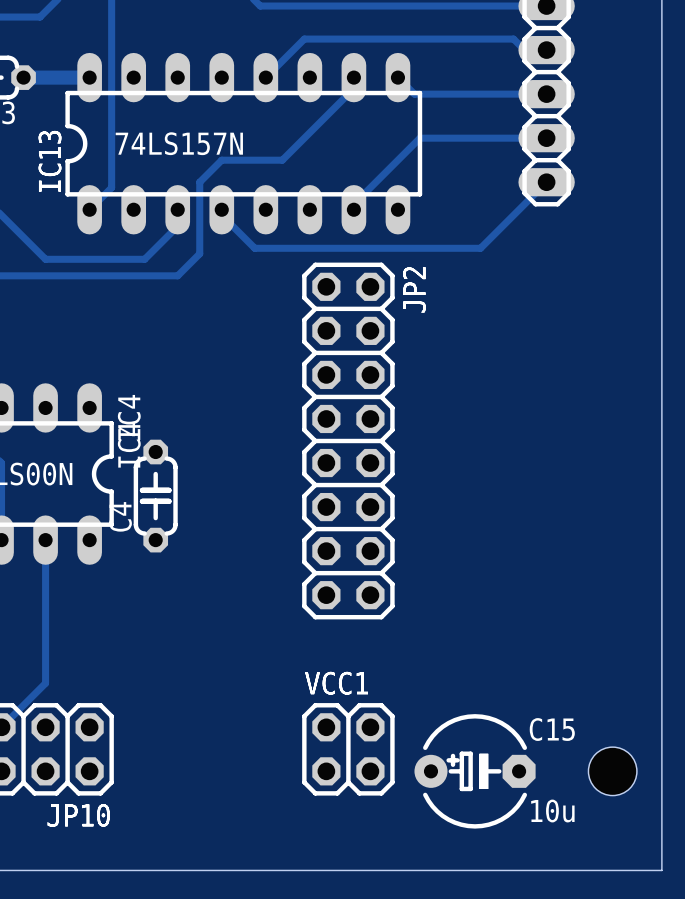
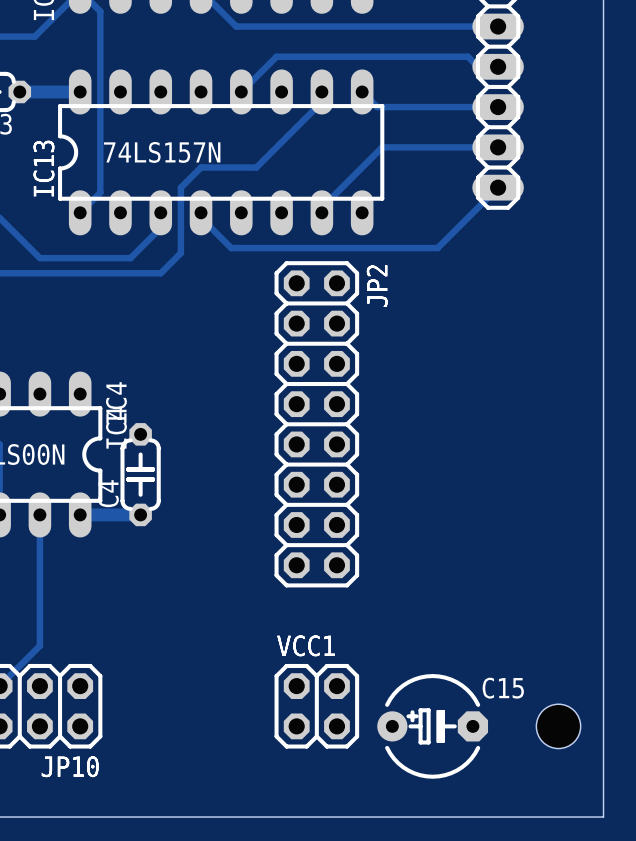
track: none -> (80, 514) (140, 514)
text: 10u (552, 811) -> none

